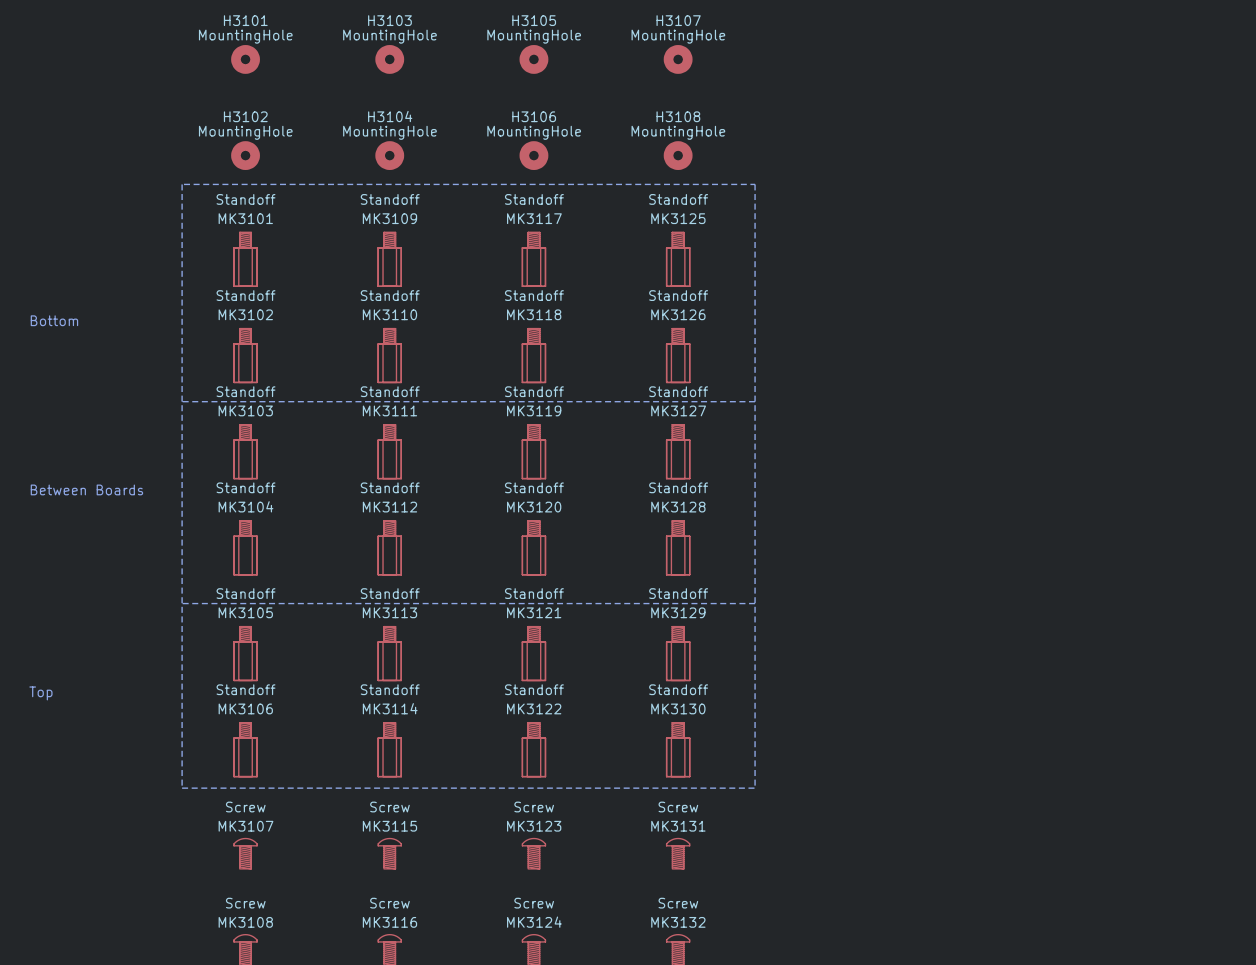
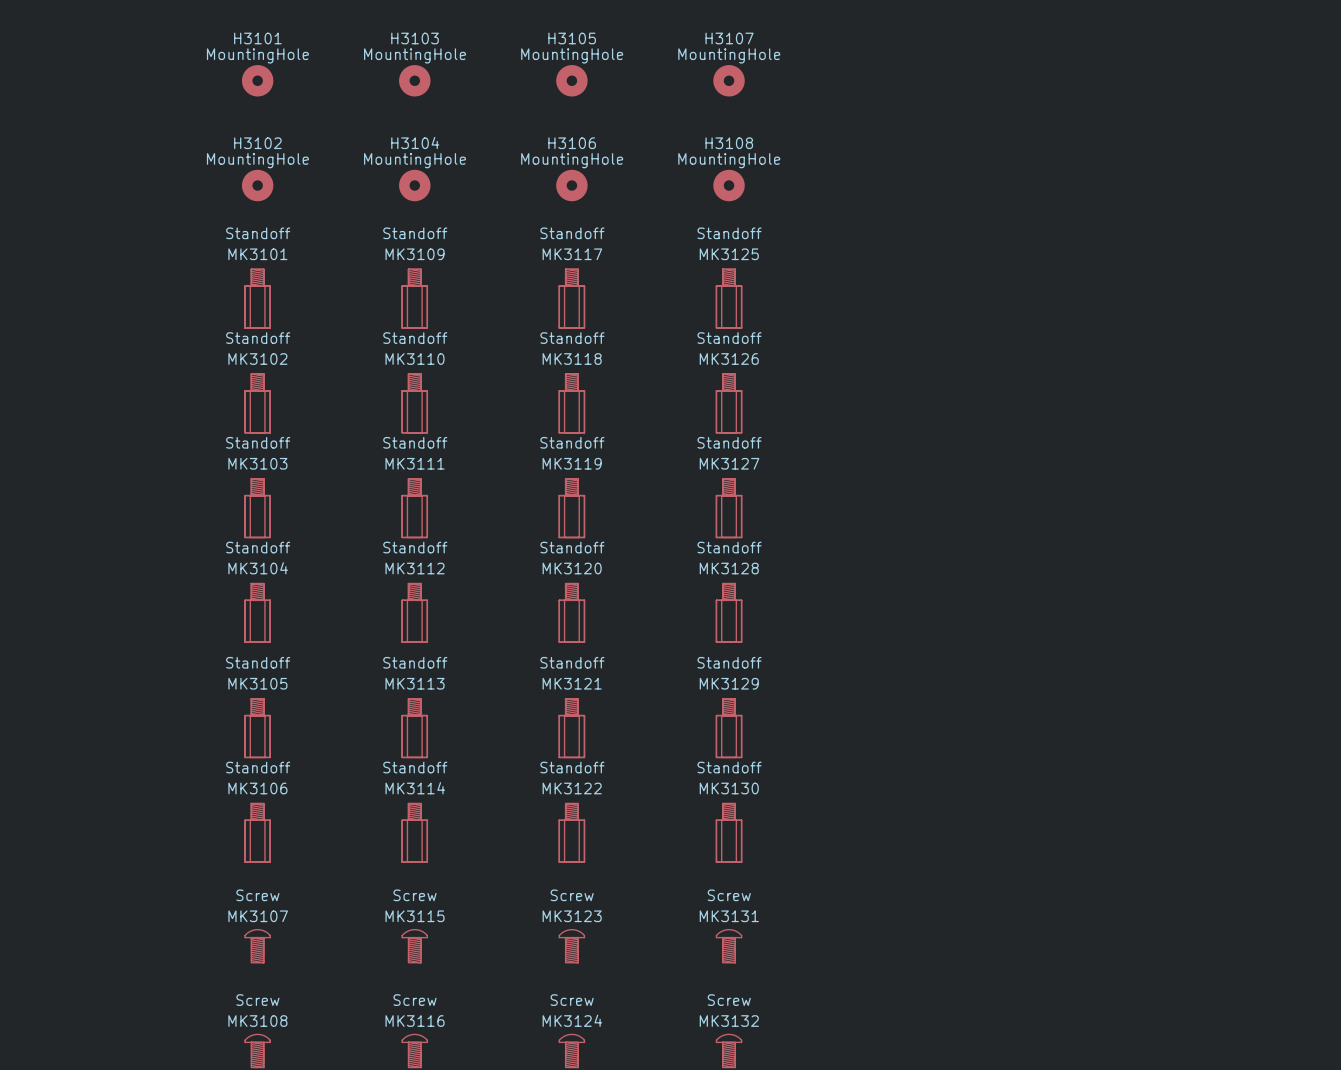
line: (182, 184) (182, 788) (755, 788) (755, 184) (184, 184) -> none
text: Bottom (54, 320) -> none
line: (182, 401) (755, 401) -> none
text: Between Boards (86, 489) -> none
line: (182, 603) (755, 603) -> none
text: Top (40, 693) -> none

